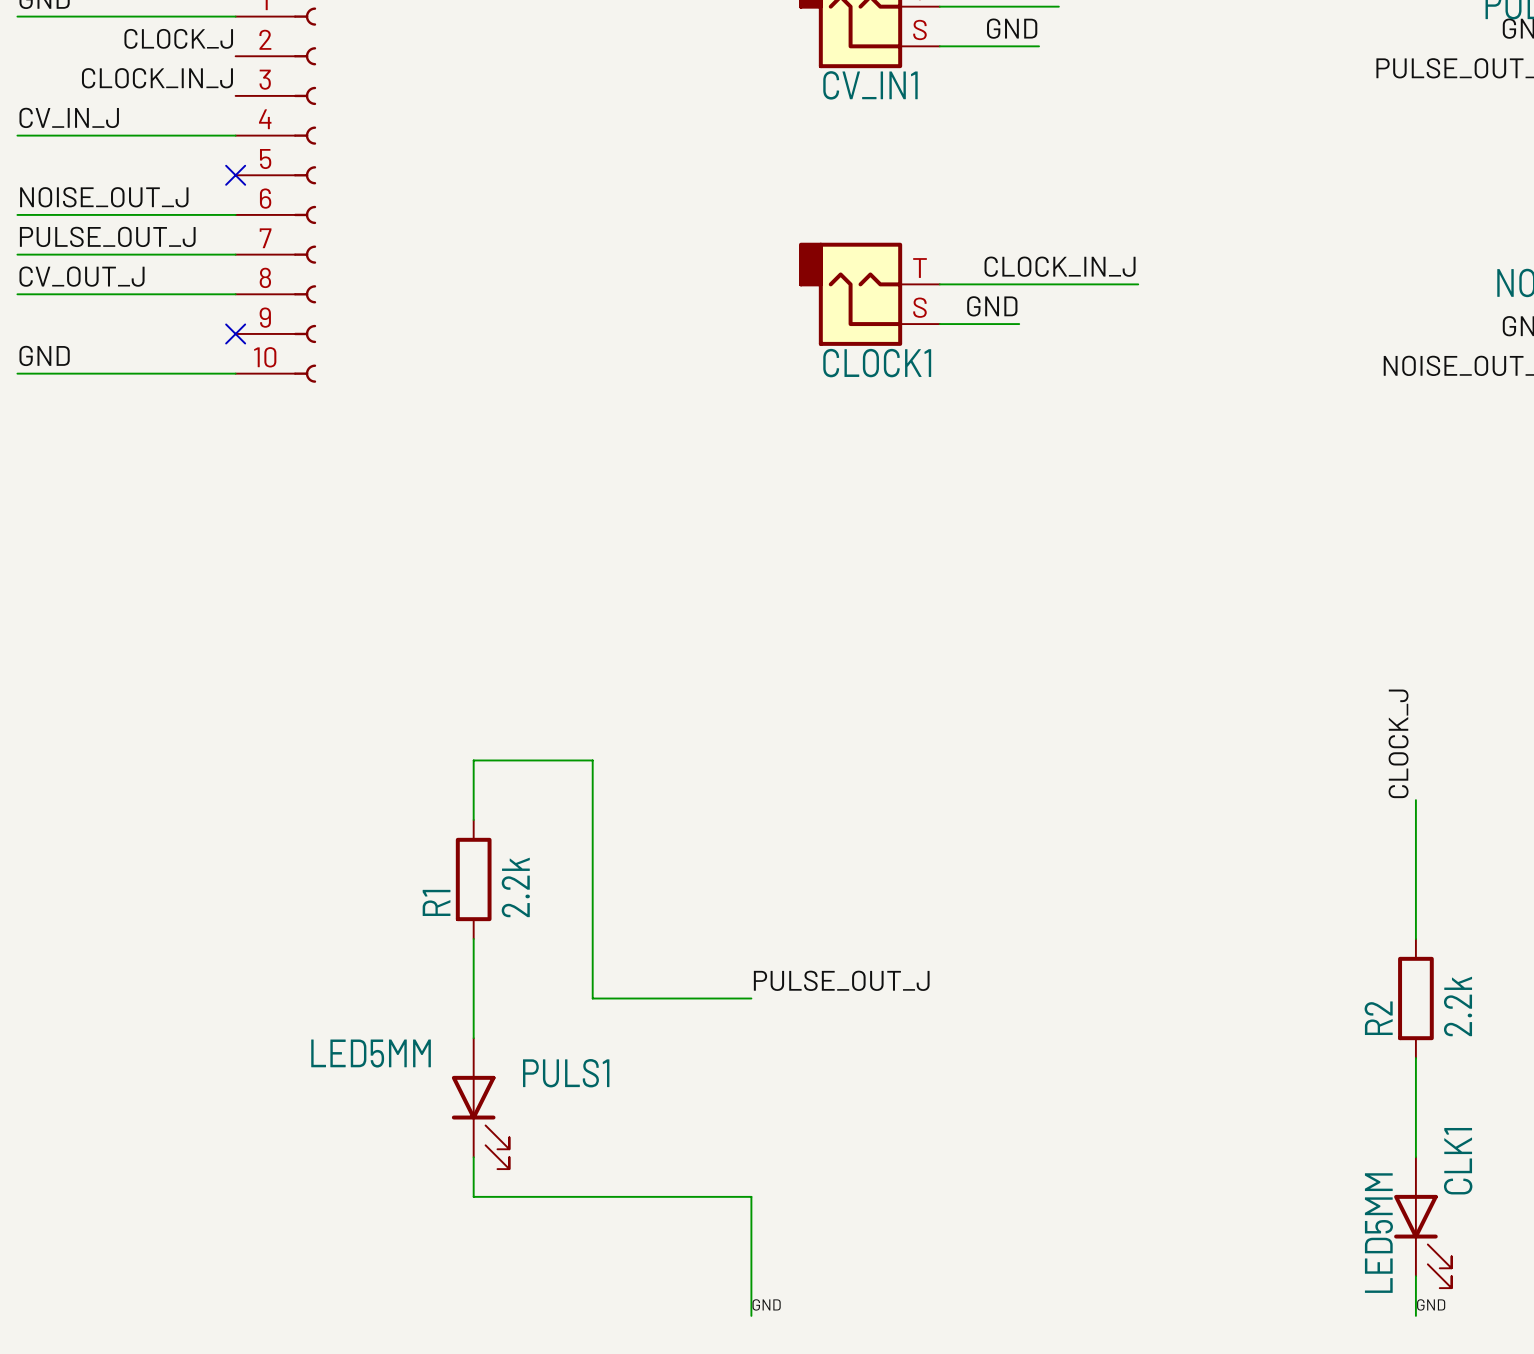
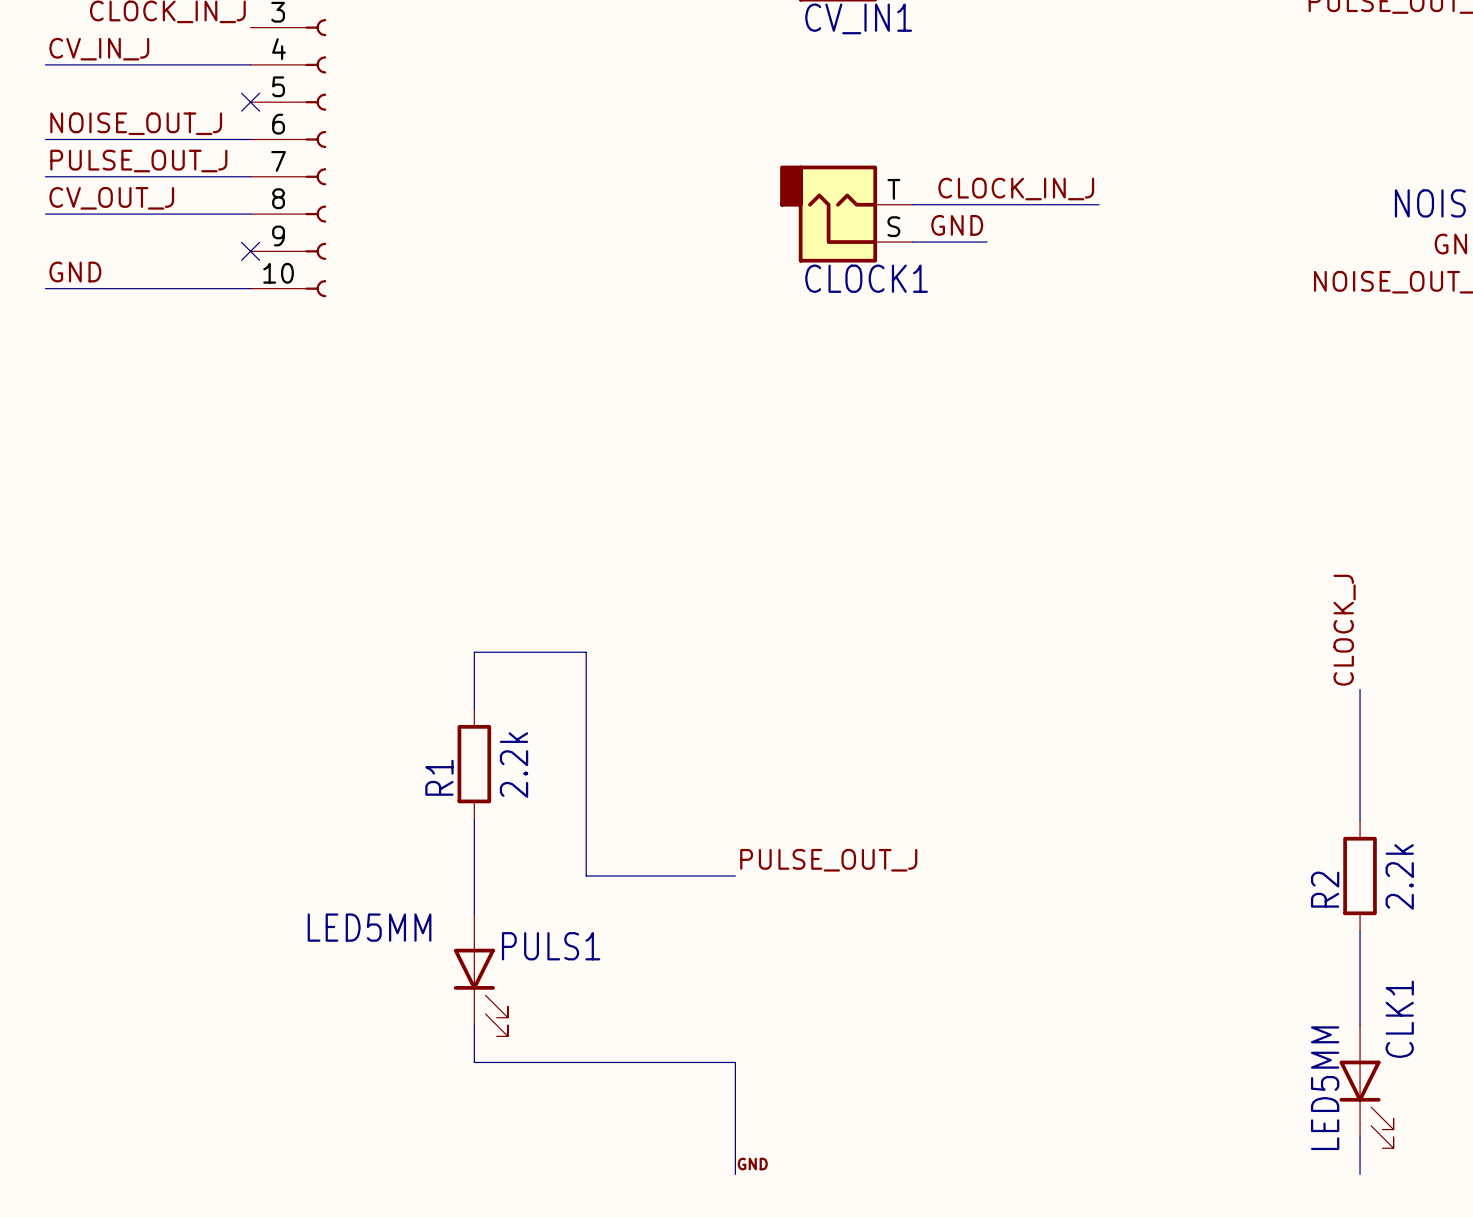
label: GND (1431, 1304) -> none

